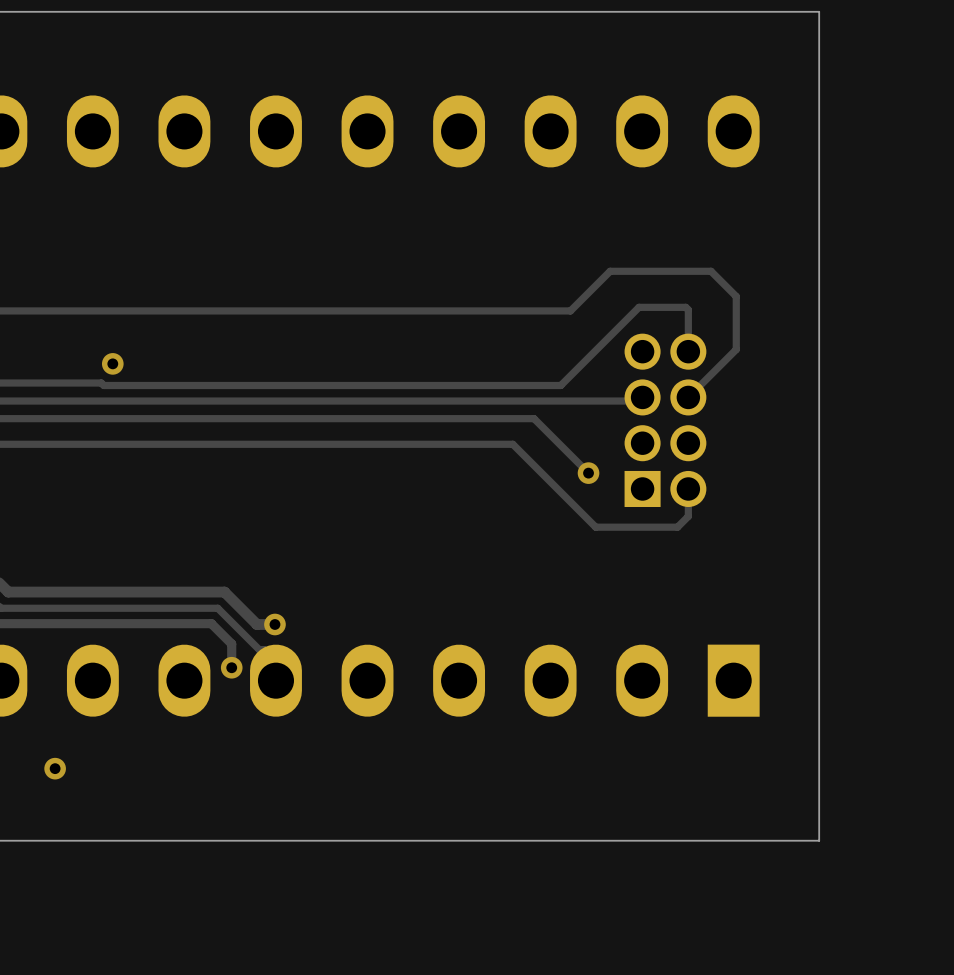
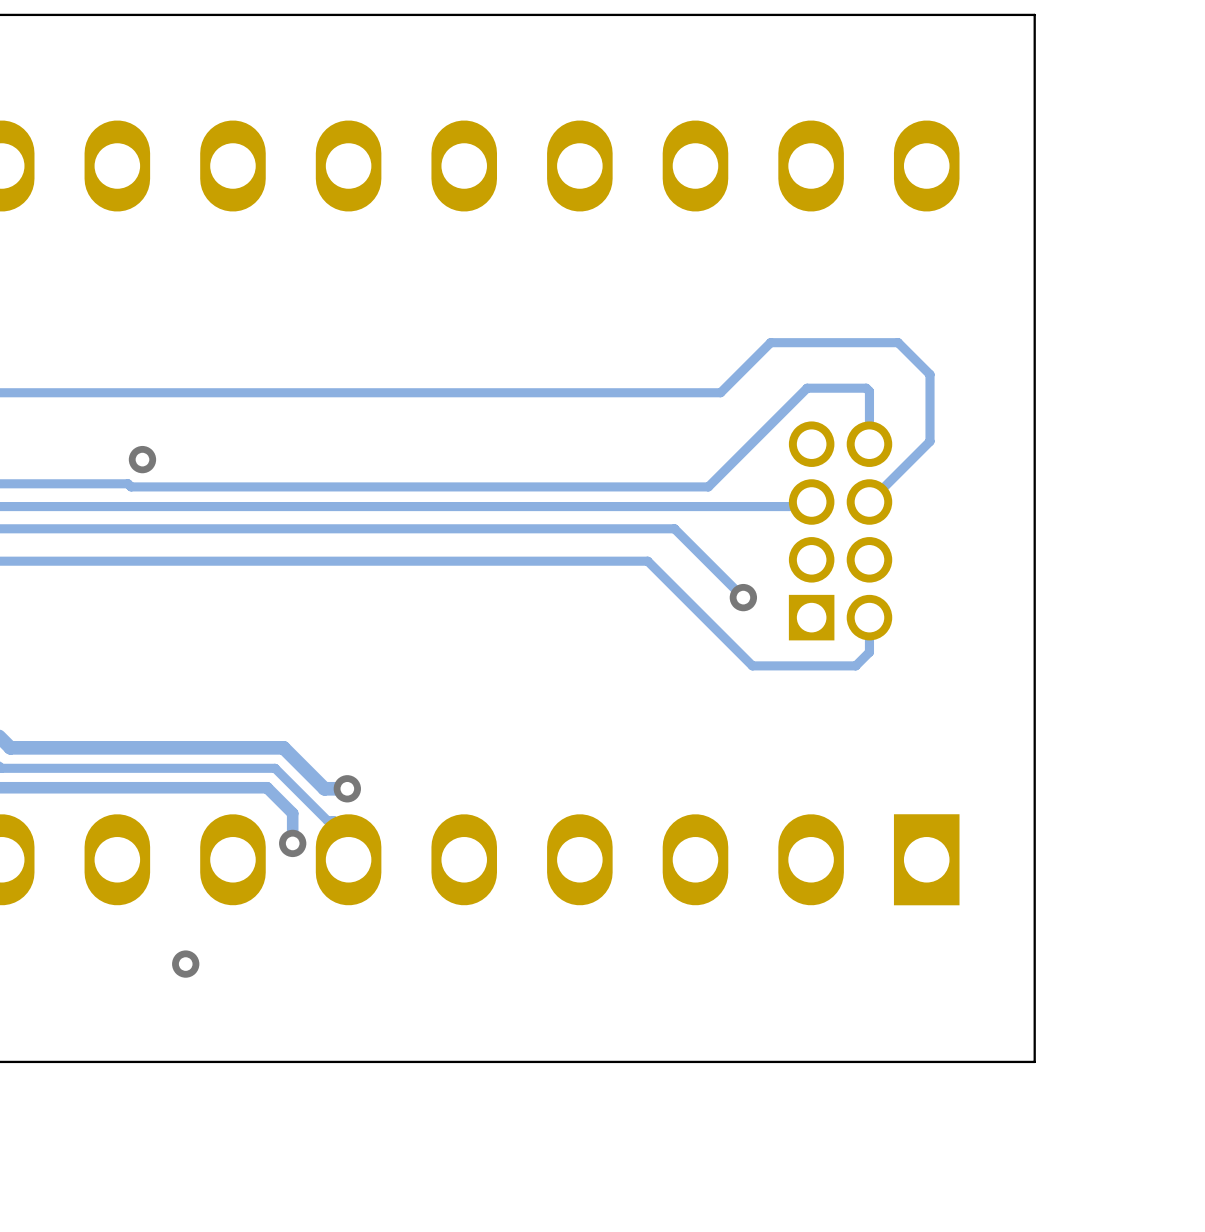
via: none -> (185, 964)
via: (55, 768) -> none

